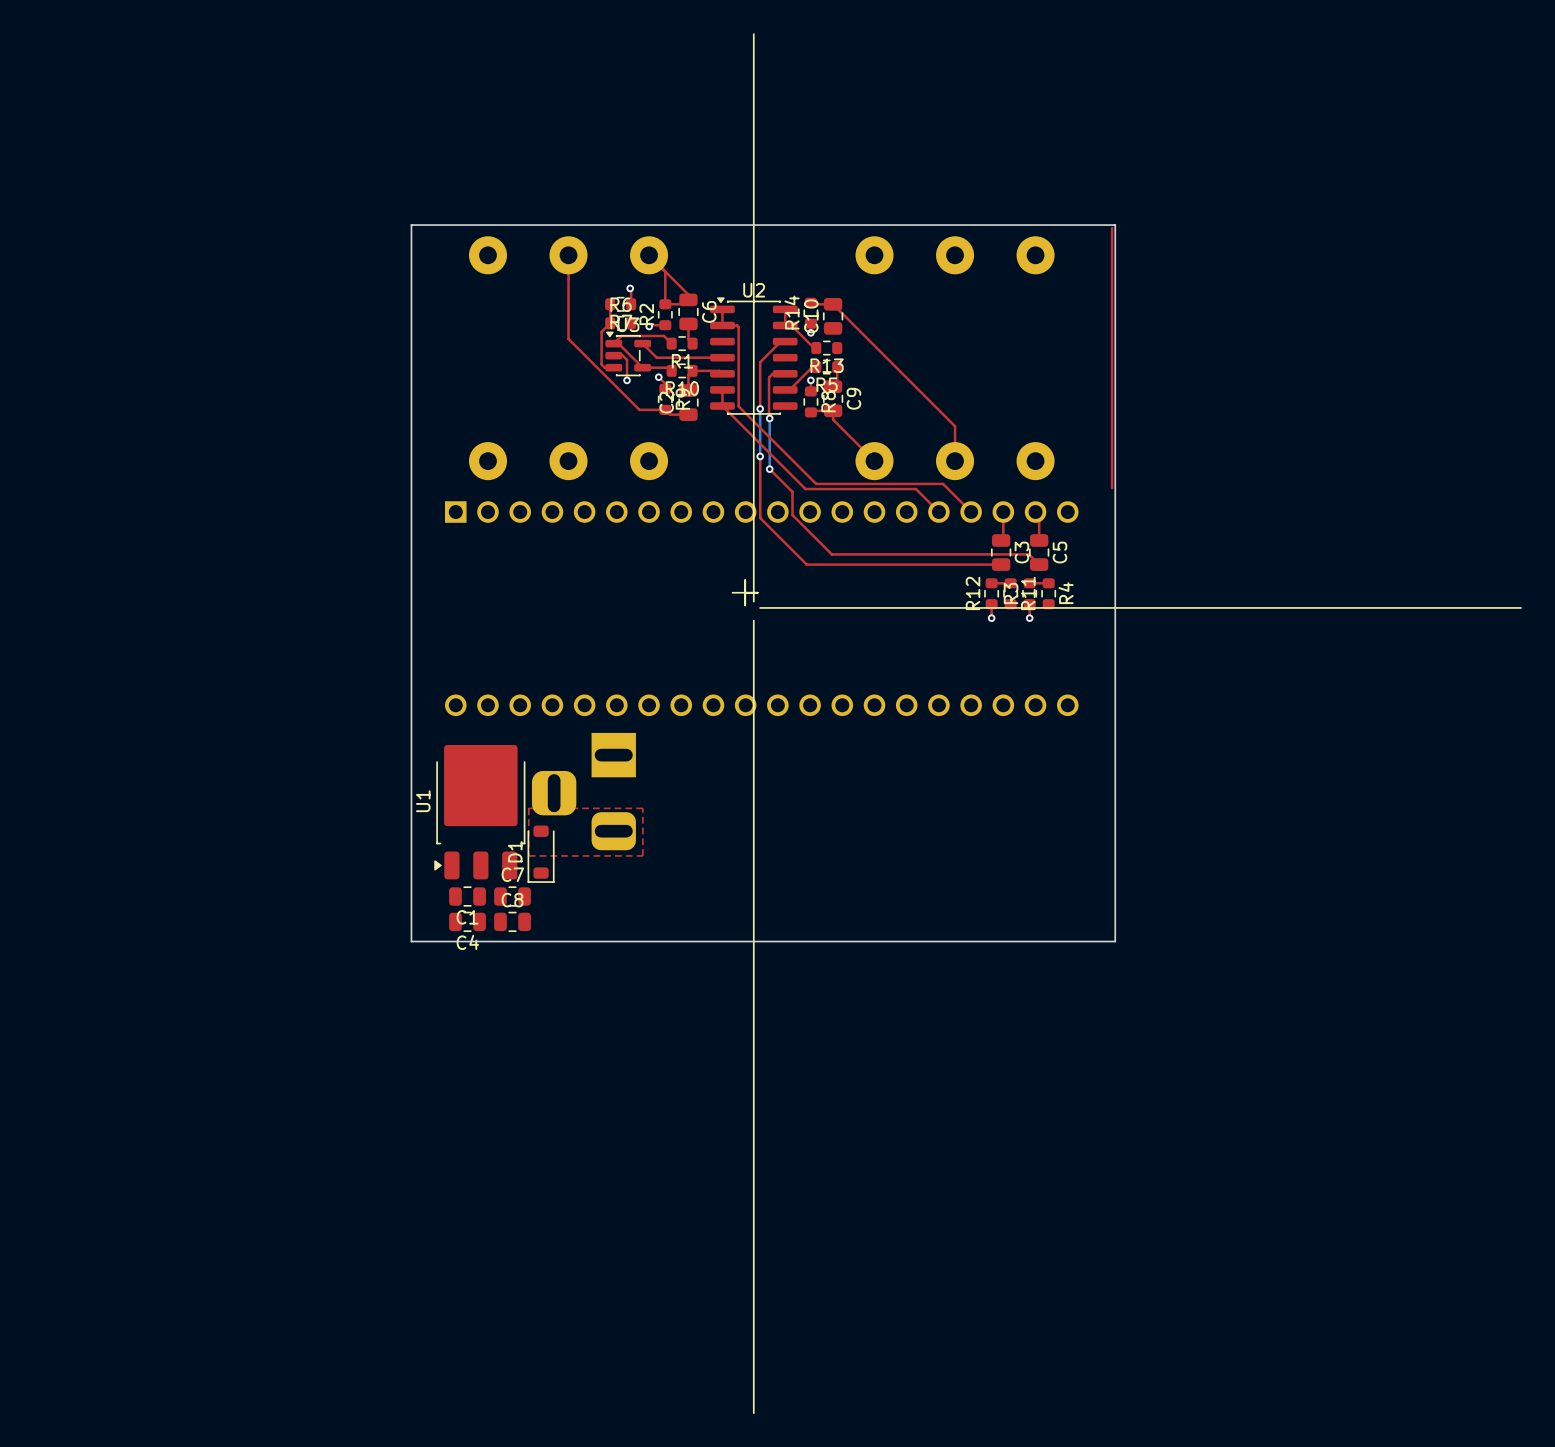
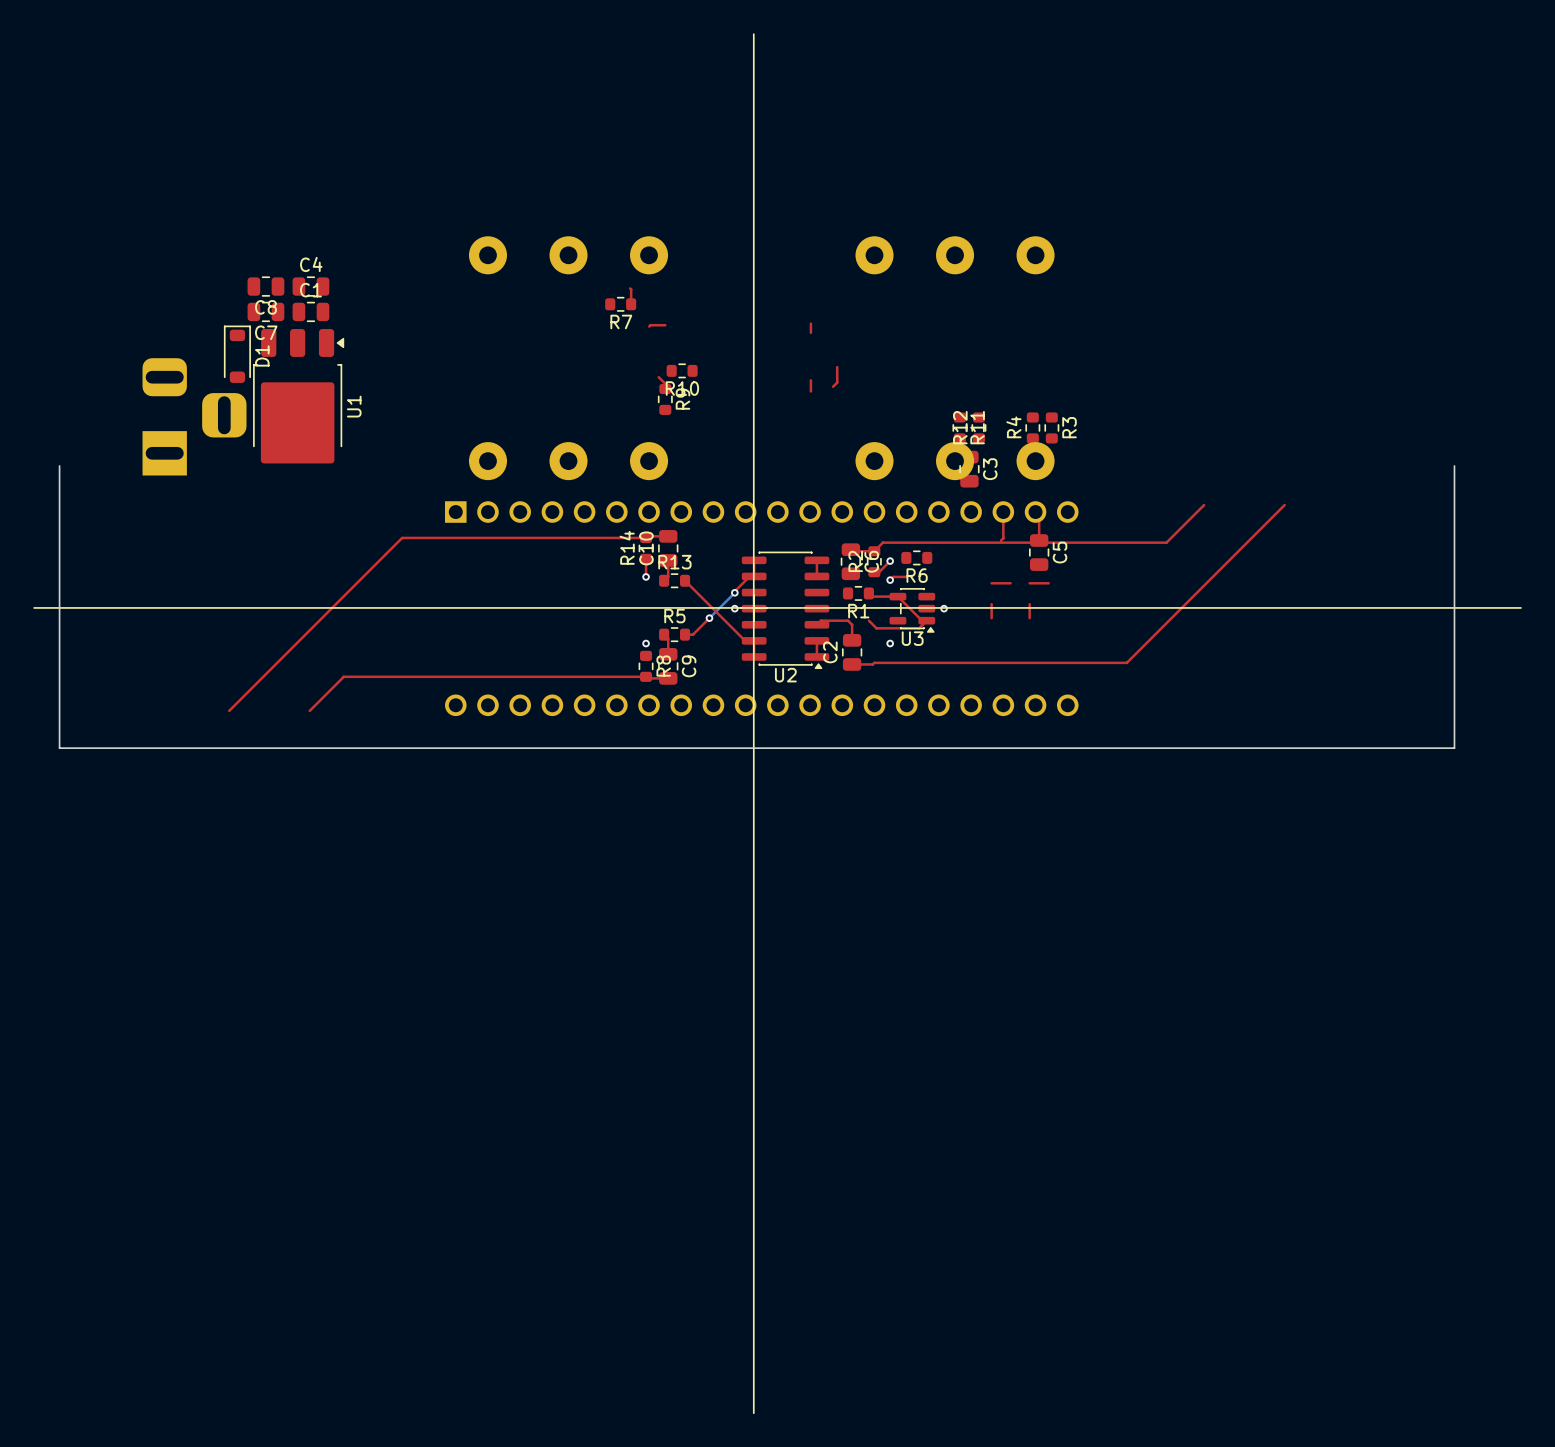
board edge: (411, 225) (1115, 225) (1115, 941) (411, 941) (411, 225) -> none
top track: (1112, 228) (1112, 488) -> none
top track: (568, 255) (568, 338) (639, 409) (665, 409) (670, 414) (688, 414) -> none
top track: (649, 255) (688, 294) (688, 299) (684, 304) (665, 304) (665, 271) -> none
via: (630, 288) -> none
top track: (810, 302) (833, 304) (955, 426) (955, 461) -> none
top track: (610, 304) (610, 323) (601, 331) (601, 364) (604, 367) (613, 367) -> none
R6 name position: R6 (621, 304) -> R6 (917, 575)
top track: (722, 309) (722, 325) (738, 327) (738, 406) (816, 483) (943, 483) (971, 512) -> none
top track: (785, 309) (785, 325) (791, 325) (813, 348) (816, 348) -> none
C6 position: (688, 311) -> (850, 561)
R14 position: (810, 313) -> (646, 548)
R2 position: (665, 314) -> (874, 561)
C10 position: (833, 316) -> (668, 548)
R6 position: (620, 323) -> (916, 557)
top track: (688, 323) (688, 339) (692, 343) -> none
via: (649, 326) -> none
via: (810, 332) -> none
top track: (785, 341) (780, 341) (760, 362) (760, 408) -> none
top track: (642, 343) (656, 357) (722, 357) -> none
top track: (671, 343) (664, 335) (621, 335) (613, 343) (618, 343) (642, 367) (668, 367) (671, 370) -> none
R1 position: (682, 343) -> (858, 593)
R13 position: (826, 348) -> (674, 580)
U3 rotation: 0° (628, 353) -> 180° (912, 610)
U3 position: (628, 353) -> (912, 610)
top track: (613, 355) (622, 355) (627, 359) (627, 380) -> none
U2 rotation: 0° (753, 356) -> 180° (785, 610)
U2 position: (753, 356) -> (785, 610)
R13 name position: R13 (827, 365) -> R13 (674, 562)
top track: (816, 367) (812, 367) (789, 389) (785, 389) -> none
R5 position: (826, 367) -> (674, 634)
top track: (722, 373) (719, 370) (692, 370) (688, 375) (688, 390) -> none
top track: (785, 373) (772, 373) (769, 377) (769, 418) -> none
via: (658, 377) -> none
via: (627, 380) -> none
via: (810, 380) -> none
R5 name position: R5 (827, 384) -> R5 (674, 616)
top track: (722, 389) (722, 406) (805, 489) (915, 489) (938, 512) -> none
C9 position: (833, 398) -> (668, 666)
R8 position: (810, 401) -> (646, 666)
C2 position: (688, 402) -> (852, 652)
bottom track: (760, 408) (760, 456) -> none
via: (760, 408) -> none
top track: (810, 412) (833, 410) (833, 419) (874, 461) -> none
part: none -> (194, 416)
bottom track: (769, 418) (769, 469) -> none
via: (769, 418) -> none
top track: (760, 456) (760, 518) (806, 564) (1001, 564) -> none
via: (760, 456) -> none
board edge: none -> (59, 465) (59, 748) (1454, 748) (1454, 465)
top track: (769, 469) (792, 491) (792, 515) (831, 554) (1029, 554) (1039, 564) -> none
via: (769, 469) -> none
top track: none -> (1204, 505) (1166, 542) (882, 542) (874, 551) (850, 549)
top track: none -> (1284, 505) (1126, 662) (852, 664)
top track: none -> (668, 536) (402, 537) (229, 710)
C3 position: (1001, 552) -> (969, 469)
top track: none -> (646, 558) (646, 576)
top track: none -> (668, 560) (668, 576) (664, 580)
top track: none -> (754, 560) (754, 576) (749, 576) (734, 592)
top track: none -> (816, 560) (816, 576)
top track: none -> (890, 561) (879, 572) (874, 572)
via: none -> (890, 561)
via: none -> (646, 576)
top track: none -> (906, 576) (893, 576) (890, 580)
top track: none -> (685, 580) (745, 640) (754, 640) (754, 656)
line: (745, 580) (745, 605) -> none
via: none -> (890, 580)
line: (732, 592) (757, 592) -> none
bottom track: none -> (734, 592) (709, 618)
via: none -> (734, 592)
top track: none -> (868, 593) (872, 596) (897, 596) (922, 620) (926, 620) (919, 628) (876, 628) (868, 620)
R12 position: (991, 593) -> (978, 427)
R11 position: (1010, 593) -> (959, 427)
R3 name position: R3 (1011, 593) -> R3 (1069, 427)
R3 position: (1029, 593) -> (1051, 427)
R4 position: (1048, 593) -> (1032, 427)
R4 name position: R4 (1066, 593) -> R4 (1013, 427)
line: none -> (753, 601) (753, 620)
line: none -> (34, 607) (760, 607)
via: none -> (734, 608)
via: none -> (944, 608)
top track: none -> (709, 618) (692, 634) (685, 634)
via: none -> (709, 618)
via: (991, 618) -> none
via: (1029, 618) -> none
top track: none -> (816, 624) (820, 620) (848, 620) (852, 624) (852, 640)
top track: none -> (664, 634) (668, 638) (668, 654)
top track: none -> (816, 640) (816, 656)
via: none -> (646, 643)
via: none -> (890, 643)
top track: none -> (668, 678) (343, 676) (309, 710)
part: (583, 791) -> none
top zone outline: (528, 808) (642, 808) (642, 855) (528, 855) (528, 808) -> none
U1 rotation: 0° (479, 812) -> 180° (298, 396)
U1 position: (479, 812) -> (298, 396)
D1 rotation: 0° (541, 854) -> 180° (237, 354)
D1 position: (541, 854) -> (237, 354)
C7 name position: C7 (512, 874) -> C7 (266, 332)
C1 position: (467, 896) -> (310, 311)
C7 position: (512, 896) -> (265, 311)
C8 name position: C8 (512, 900) -> C8 (265, 307)
C1 name position: C1 (467, 917) -> C1 (310, 290)
C4 position: (467, 921) -> (310, 286)
C8 position: (512, 921) -> (265, 286)
C4 name position: C4 (467, 942) -> C4 (311, 264)

